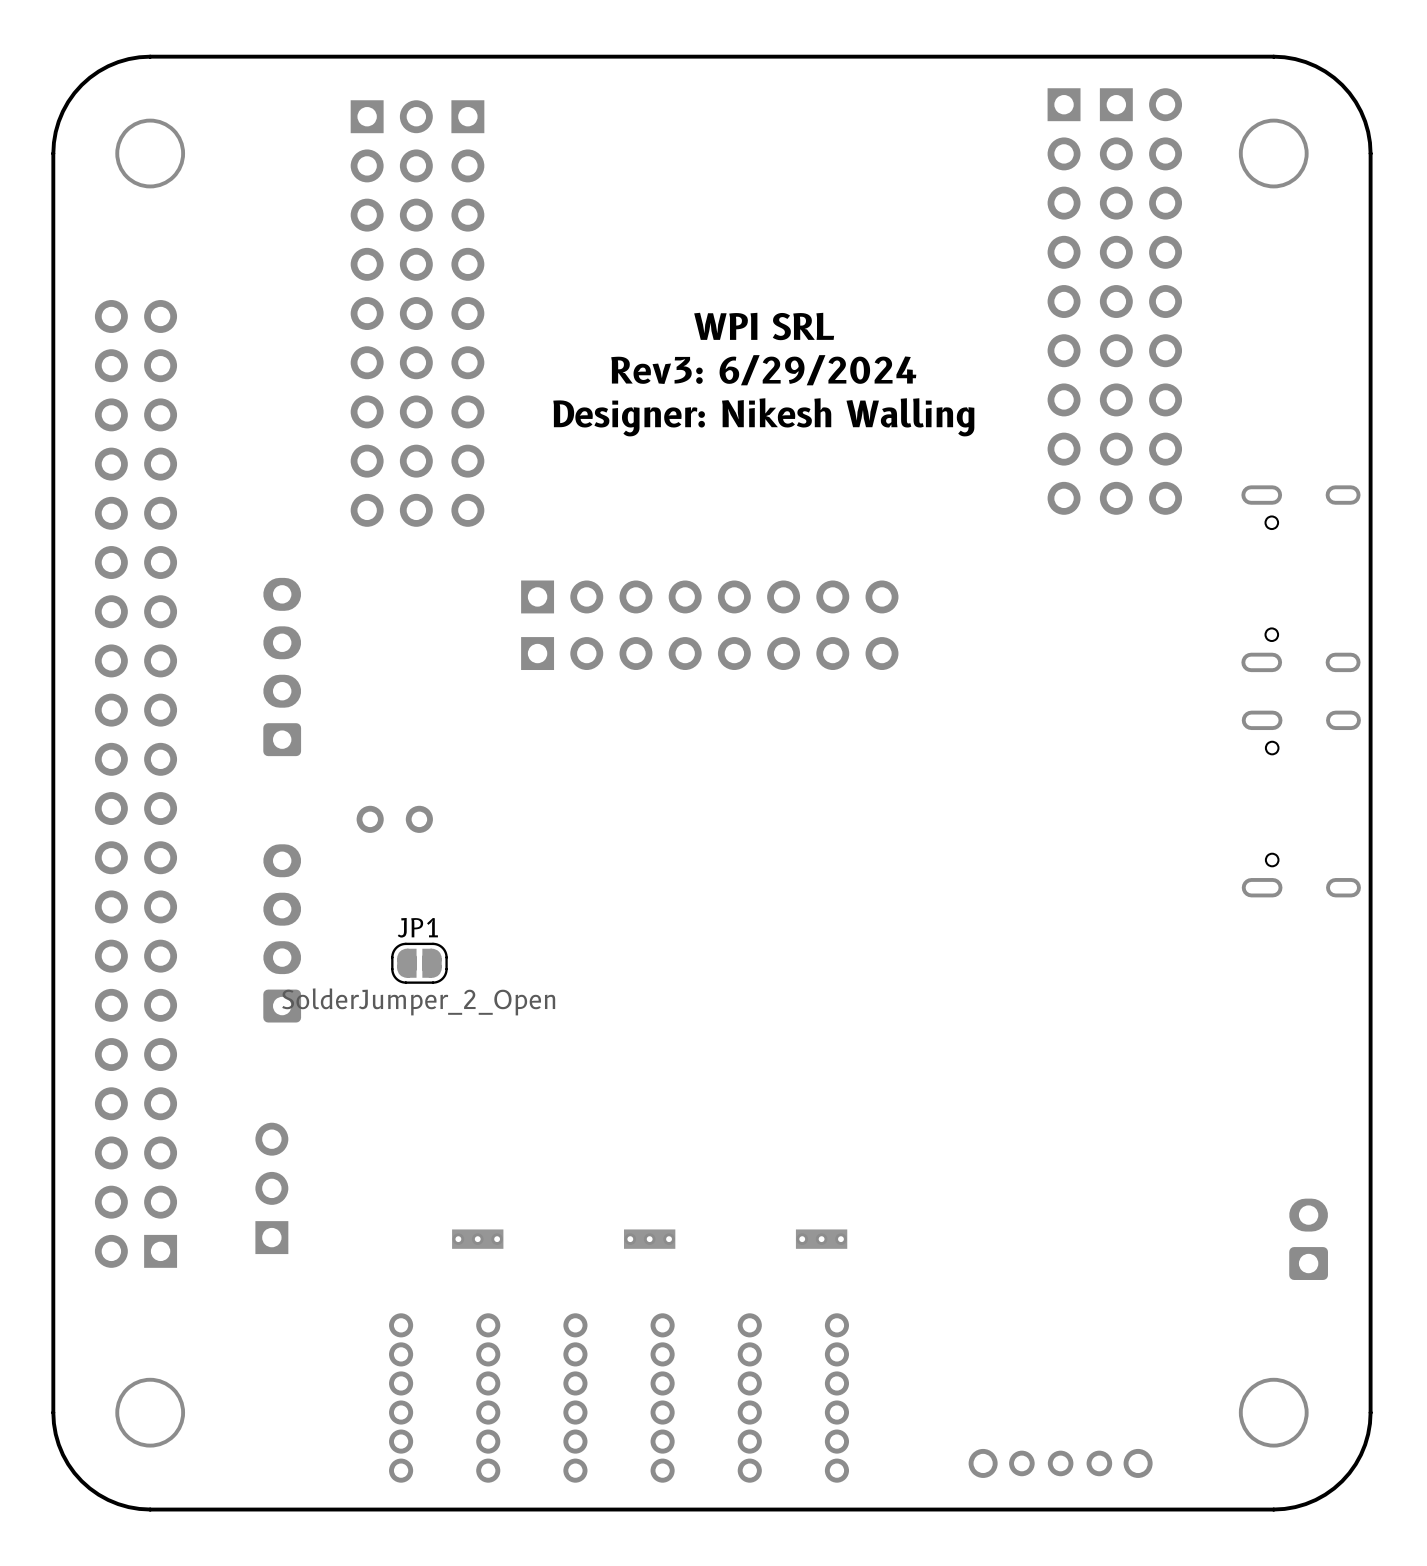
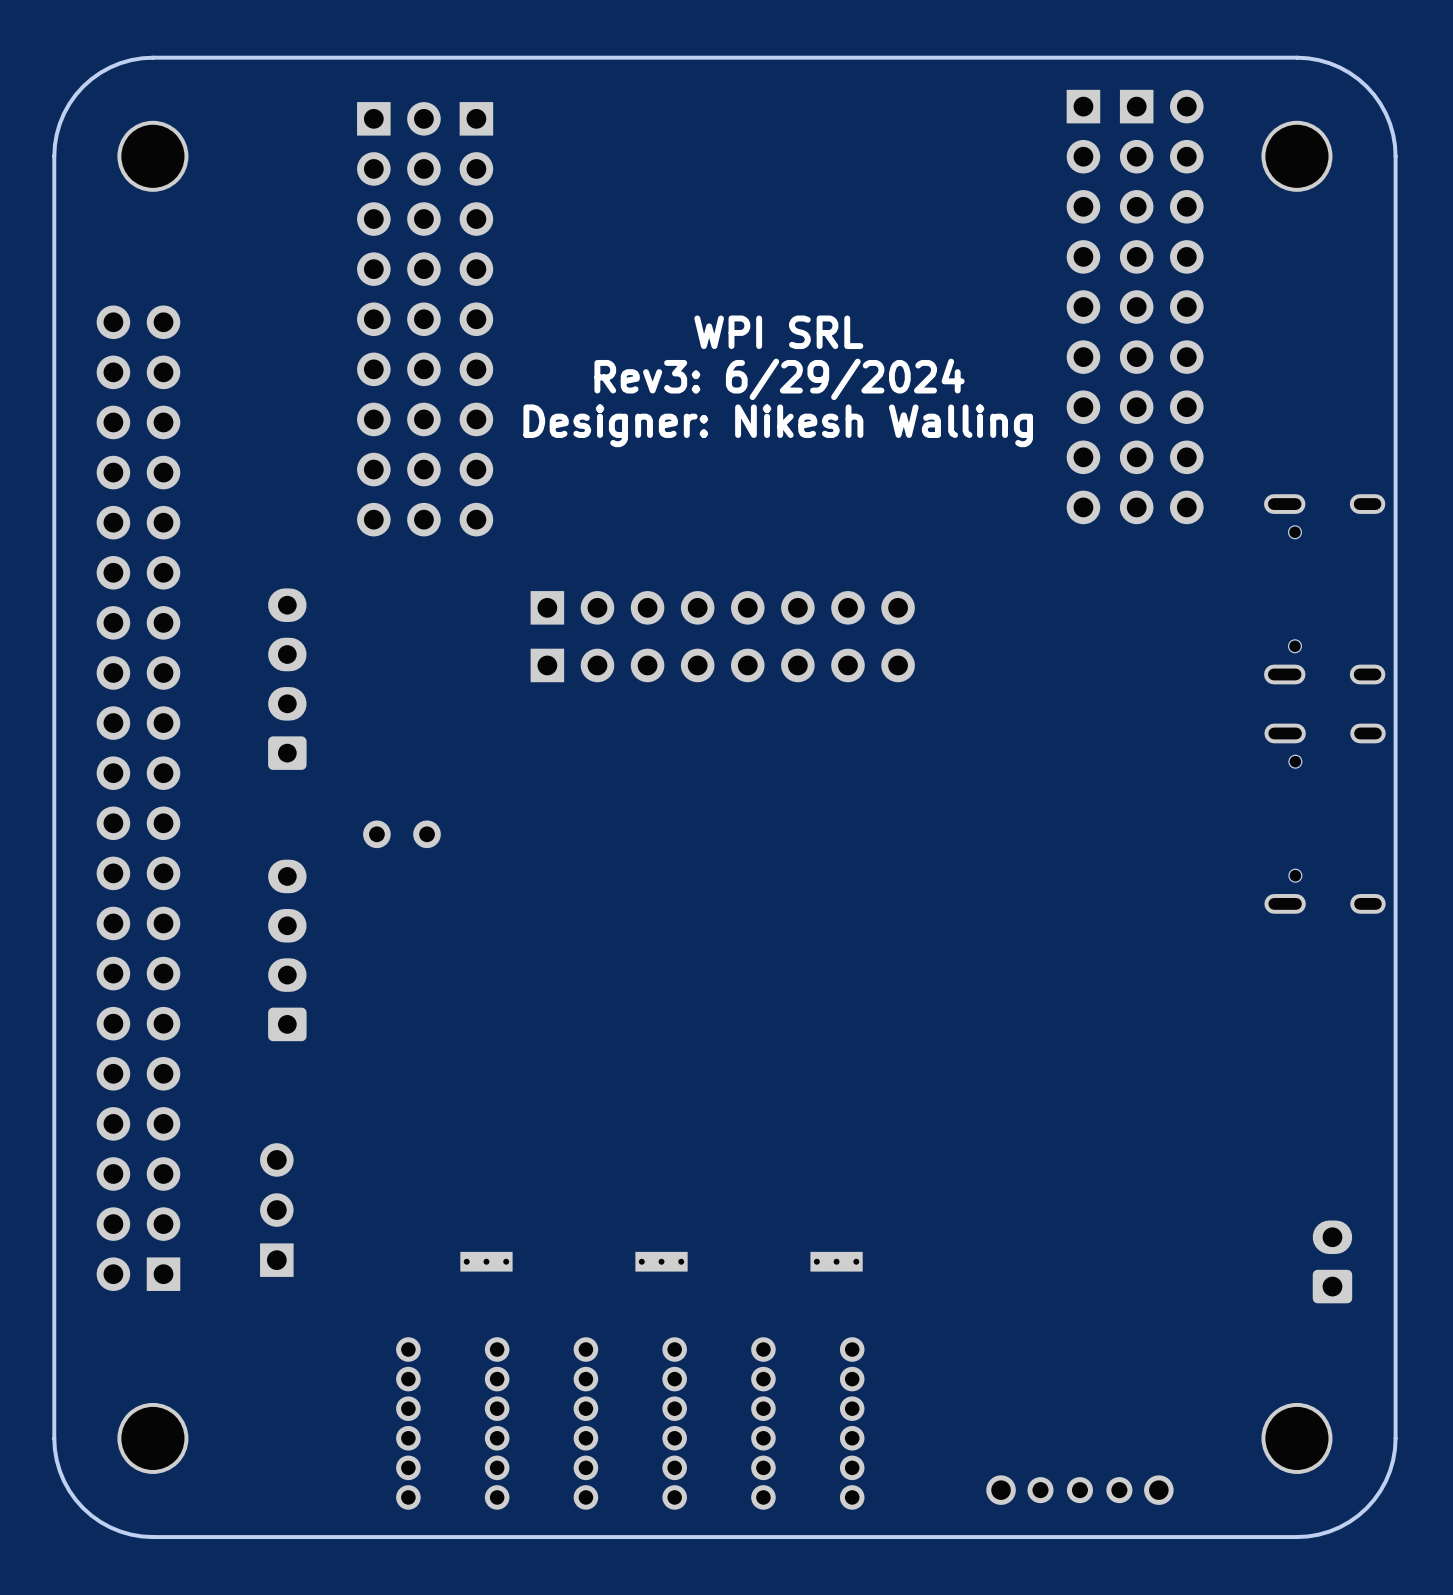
JP1: SolderJumper_2_Open (419, 963) -> none

